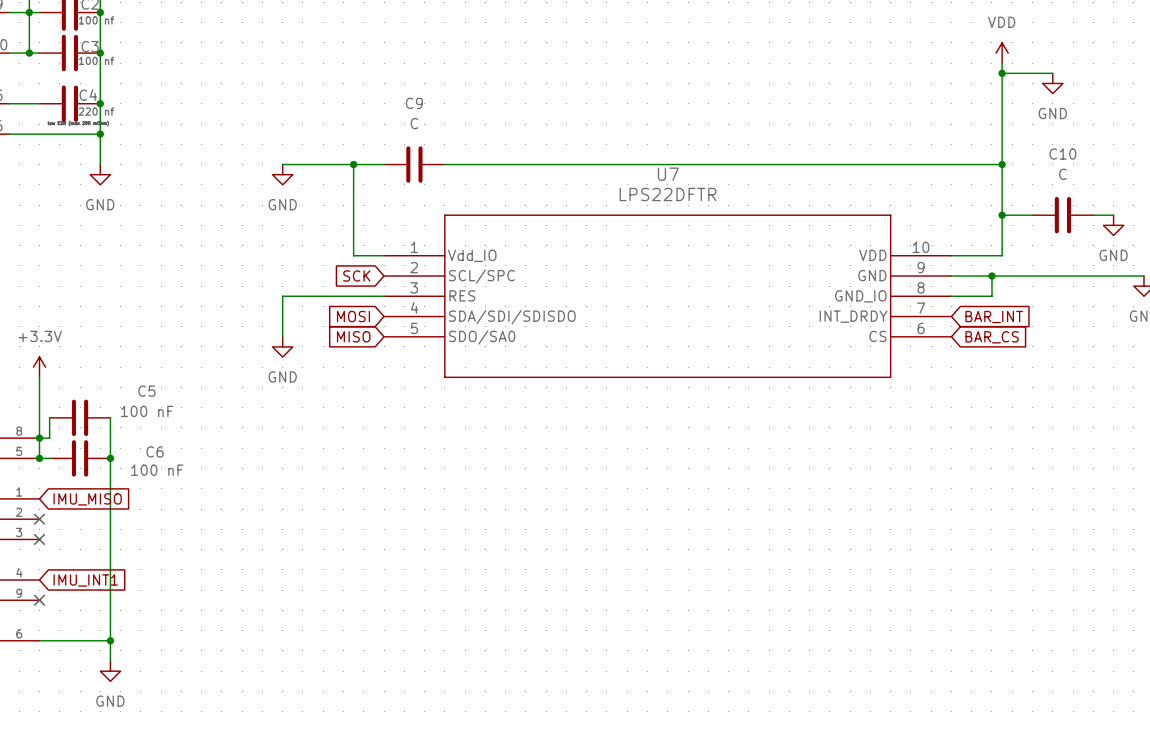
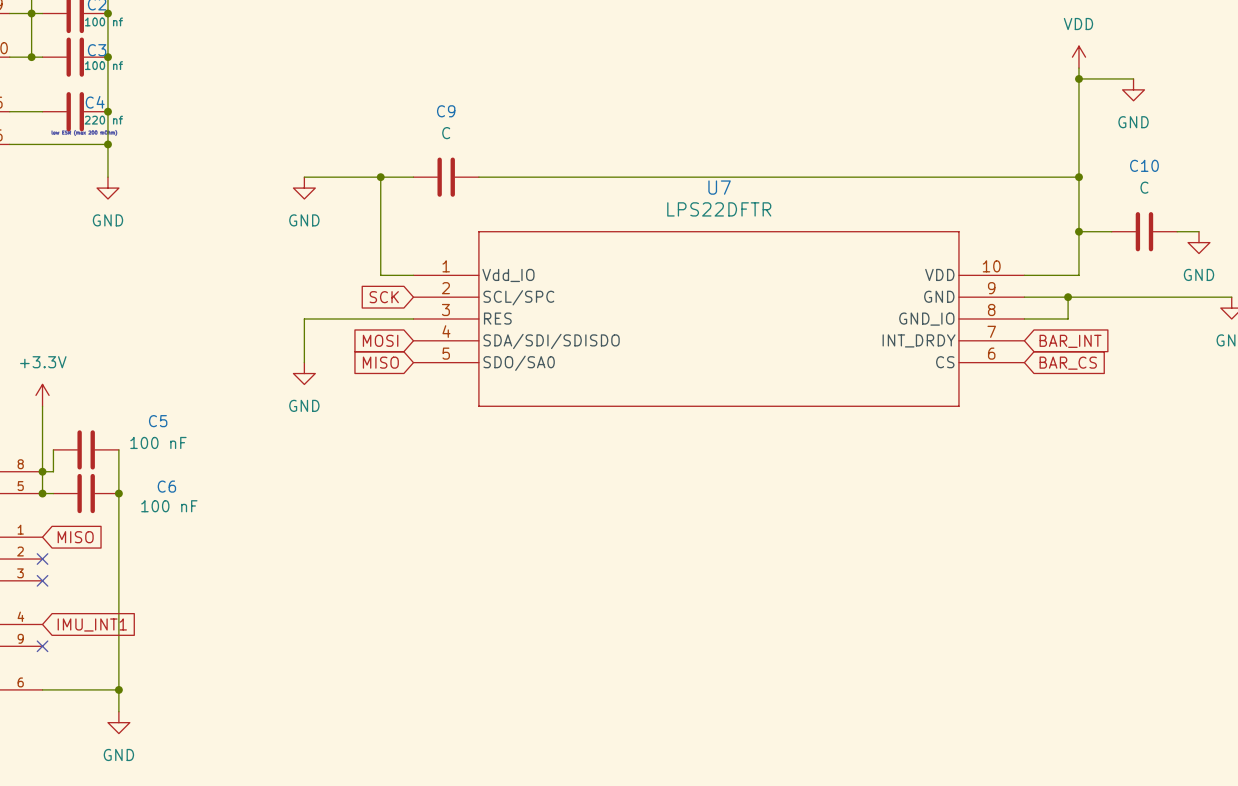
global label: IMU_MISO (87, 499) -> MISO (75, 537)

